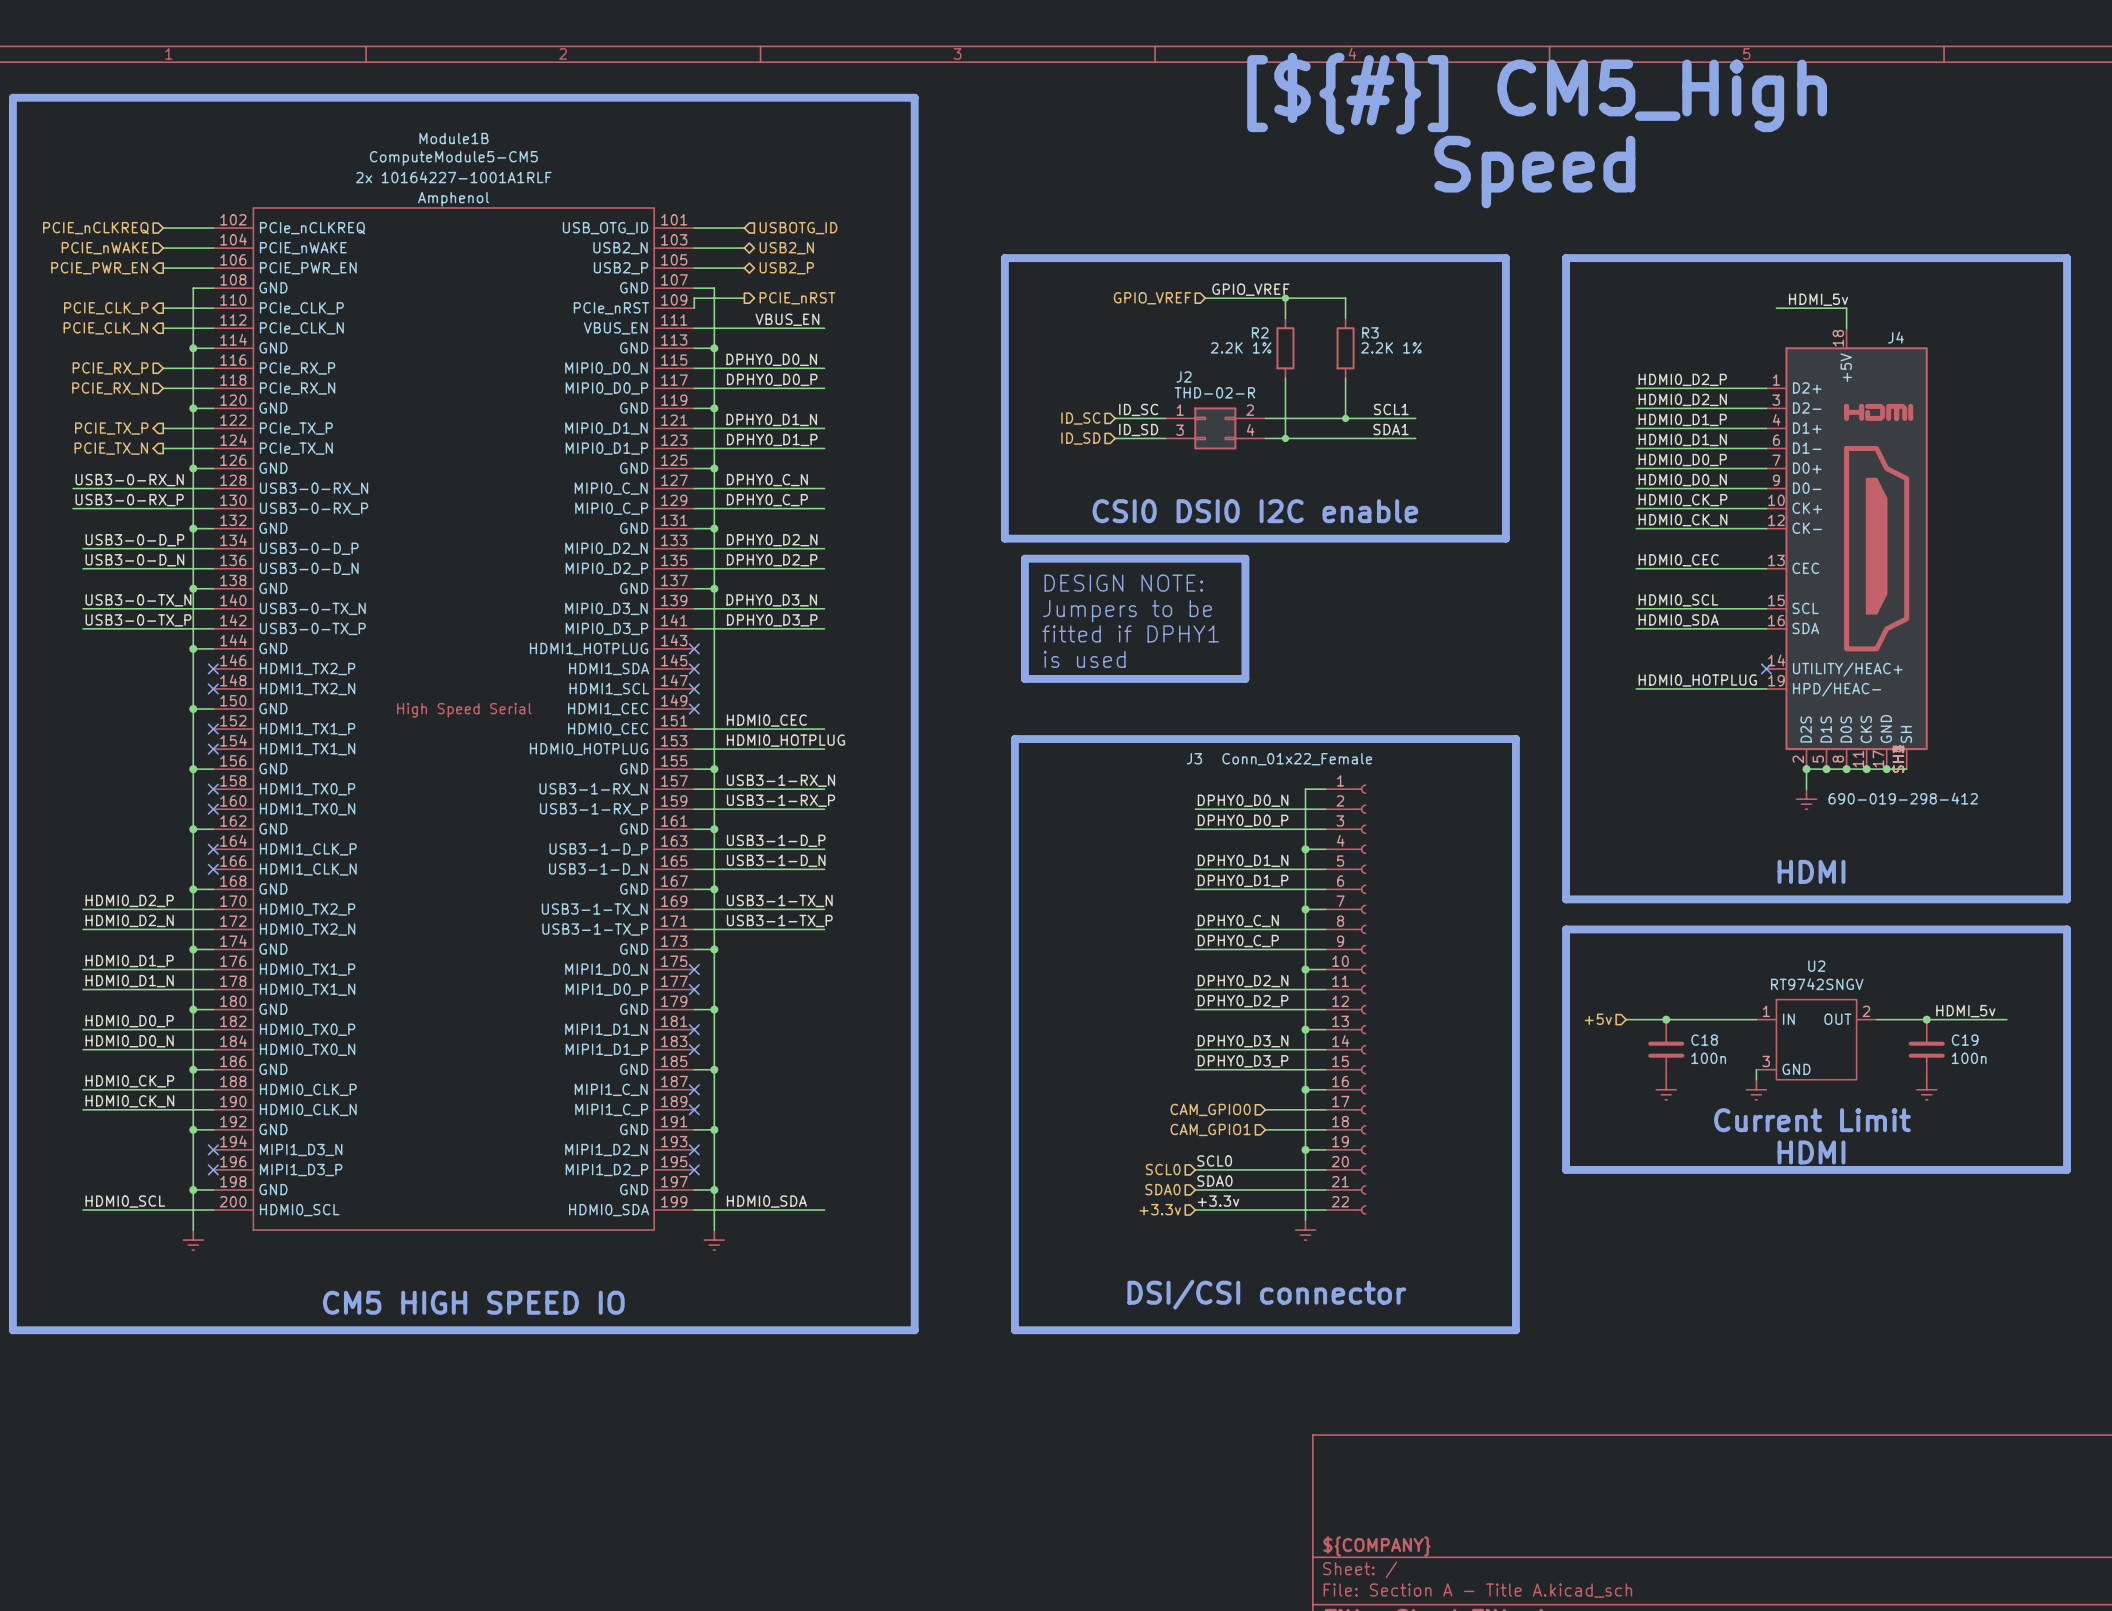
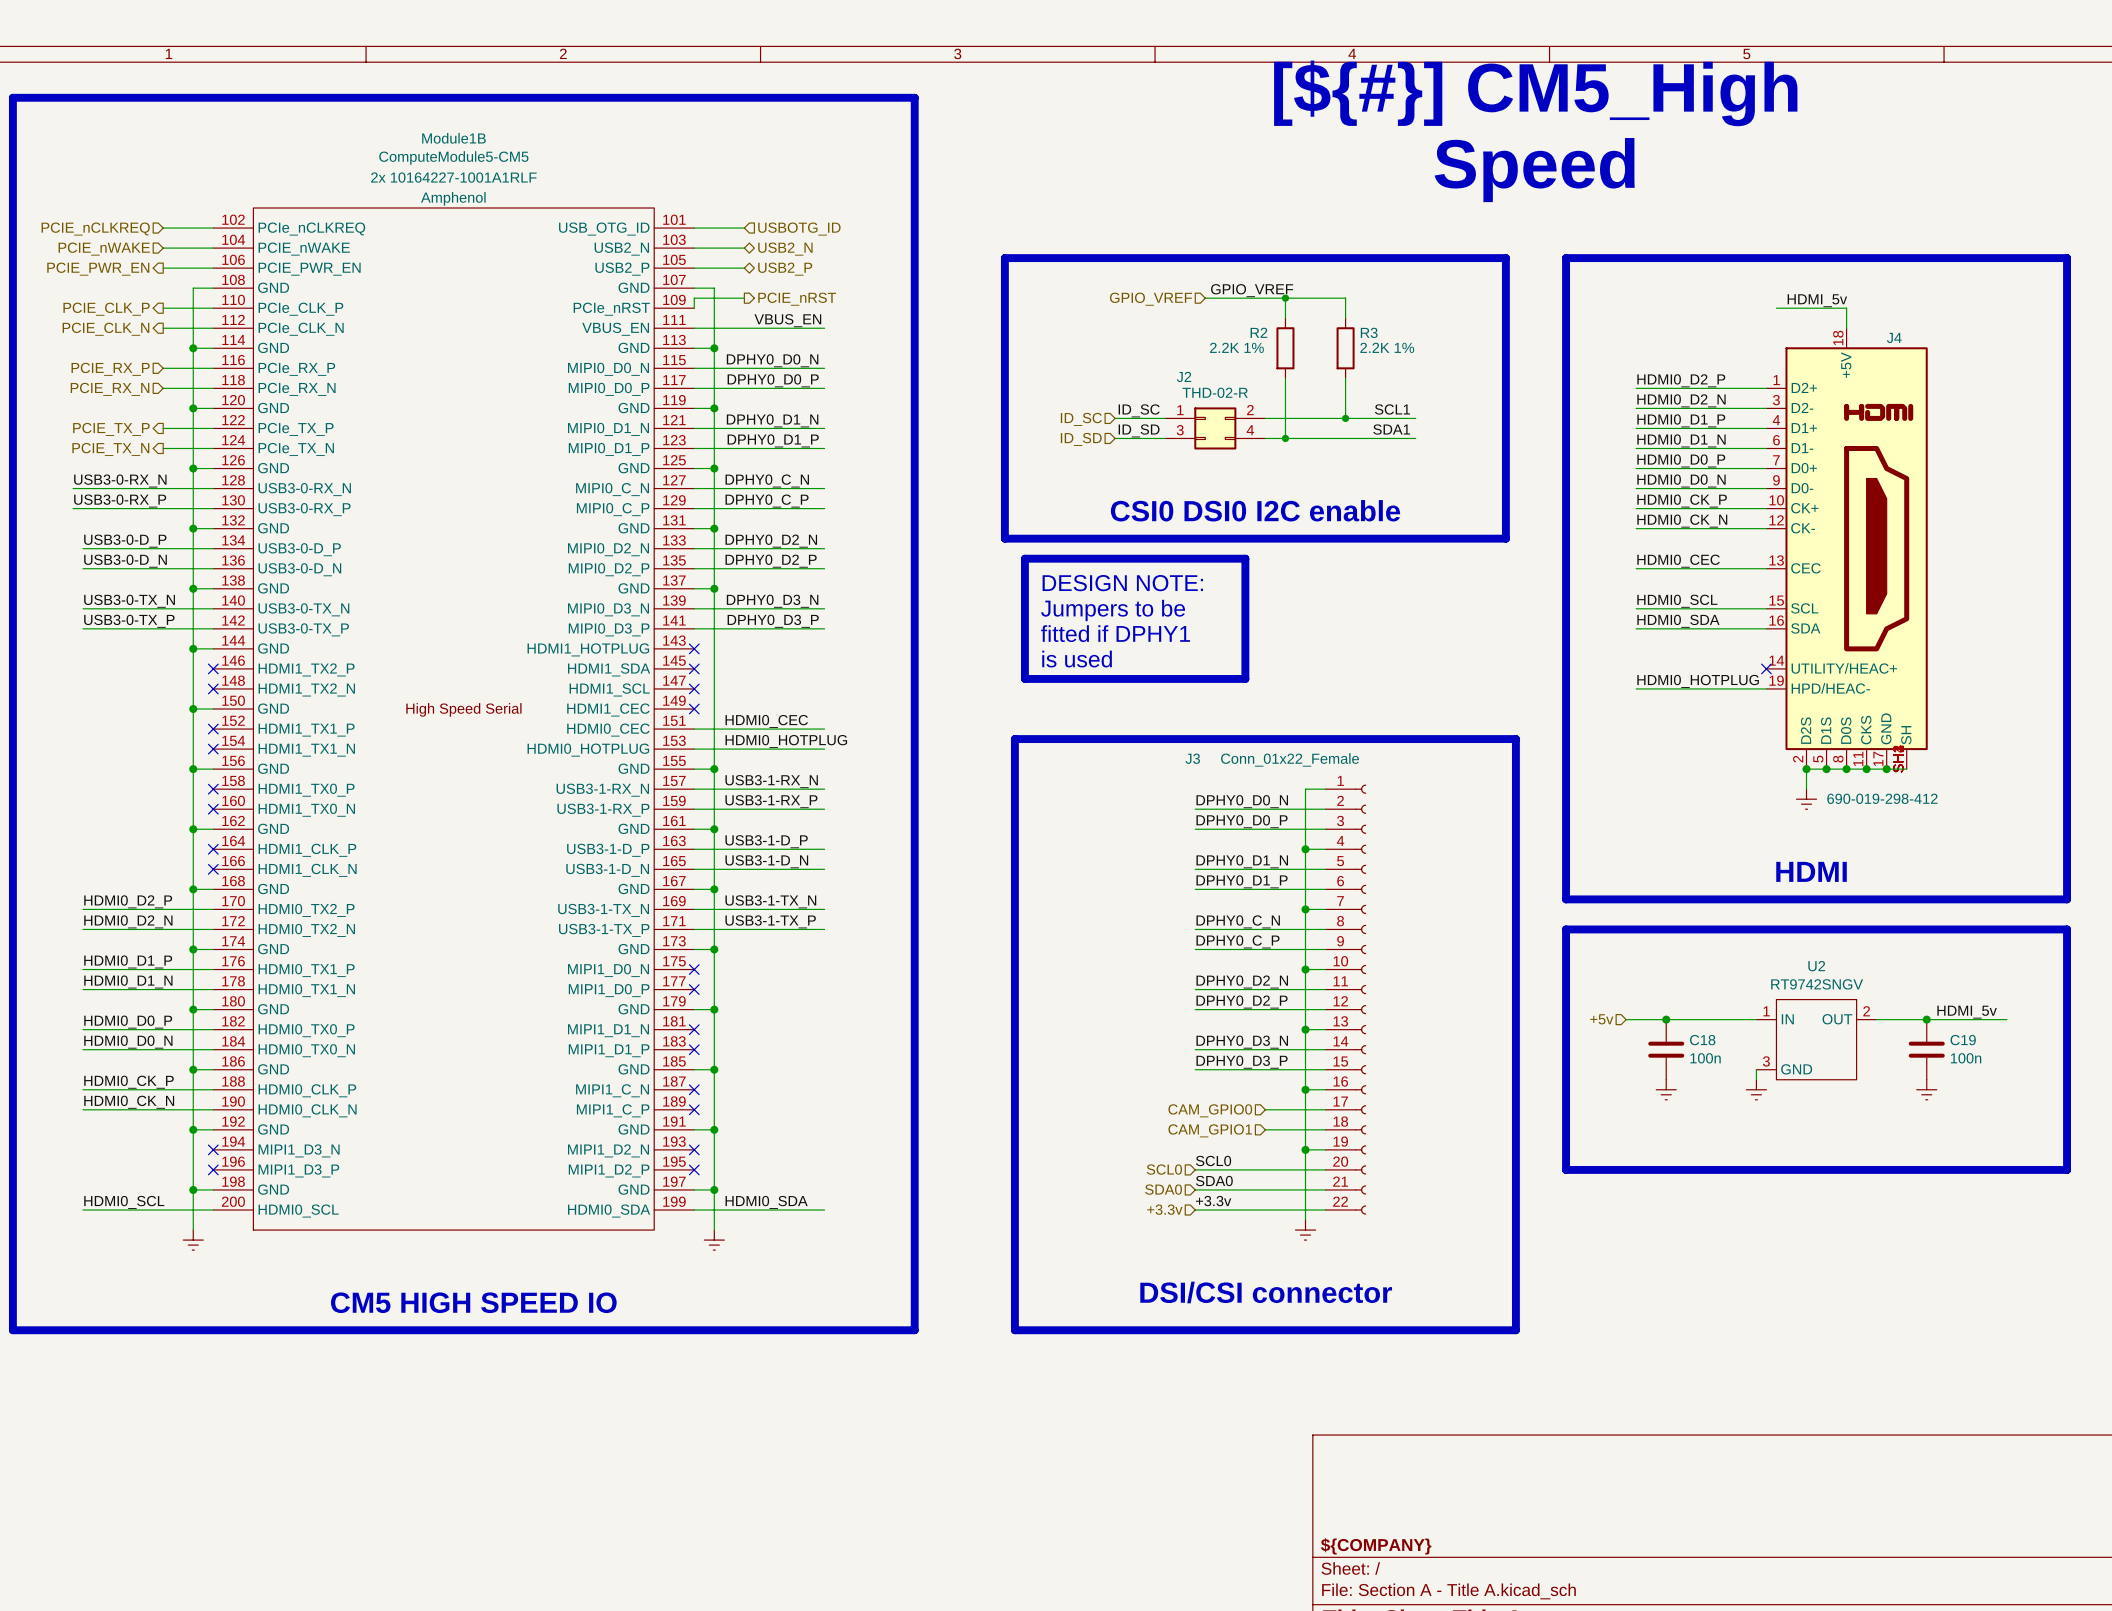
text: Current Limit (1812, 1120) -> none
text: HDMI (1811, 1152) -> none

